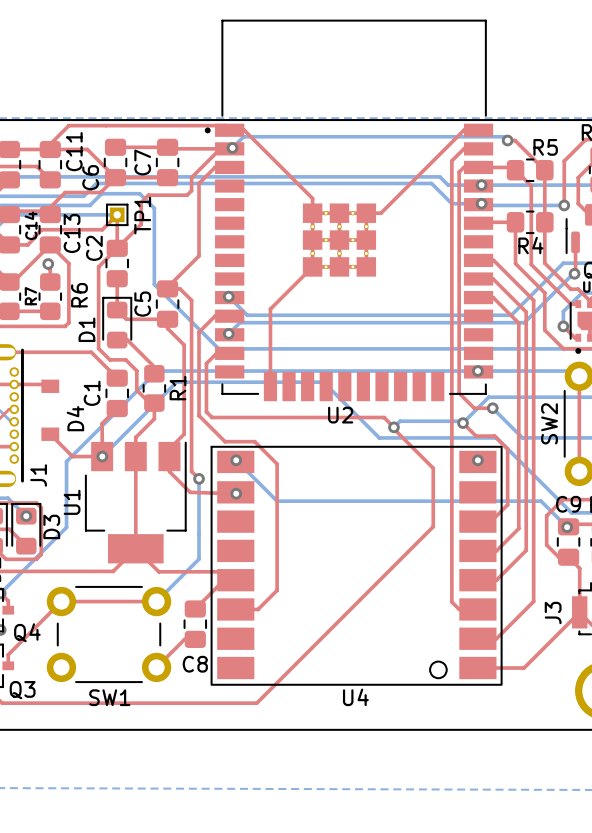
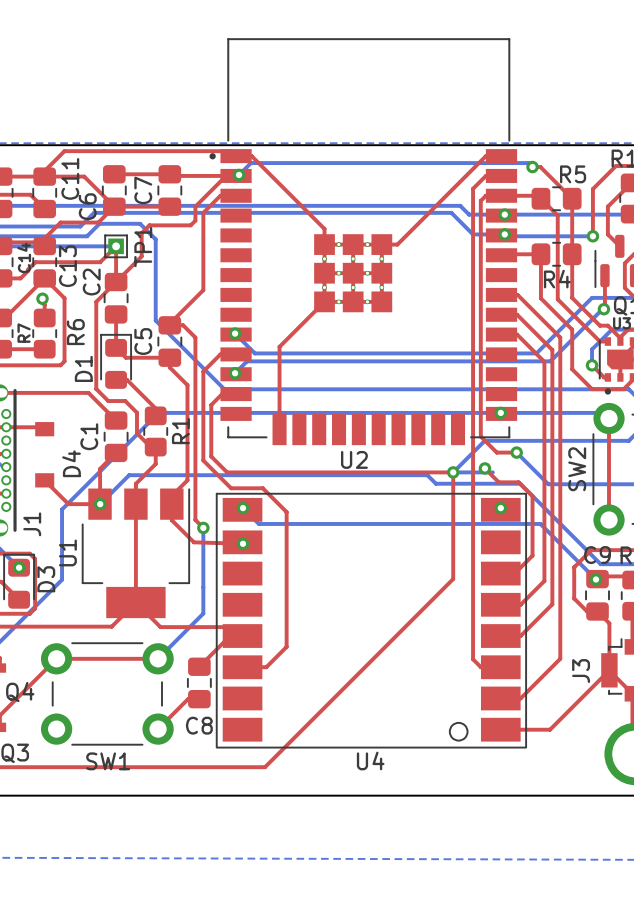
bottom track: (488, 397) (463, 422) -> (512, 440) (484, 440) (453, 472) (492, 472)
top track: (212, 417) (384, 417) (433, 468) -> (217, 462) (227, 472) (453, 472) (453, 516)
bottom track: (463, 423) (461, 421) (400, 421) (393, 427) -> none
via position: (393, 427) -> (453, 472)
bottom track: (129, 429) (176, 382) (323, 382) (379, 437) (496, 437) -> (129, 475) (427, 475) (435, 483) (520, 484)
bottom track: (251, 475) (277, 501) (541, 501) -> (258, 523) (540, 523) (568, 551)

